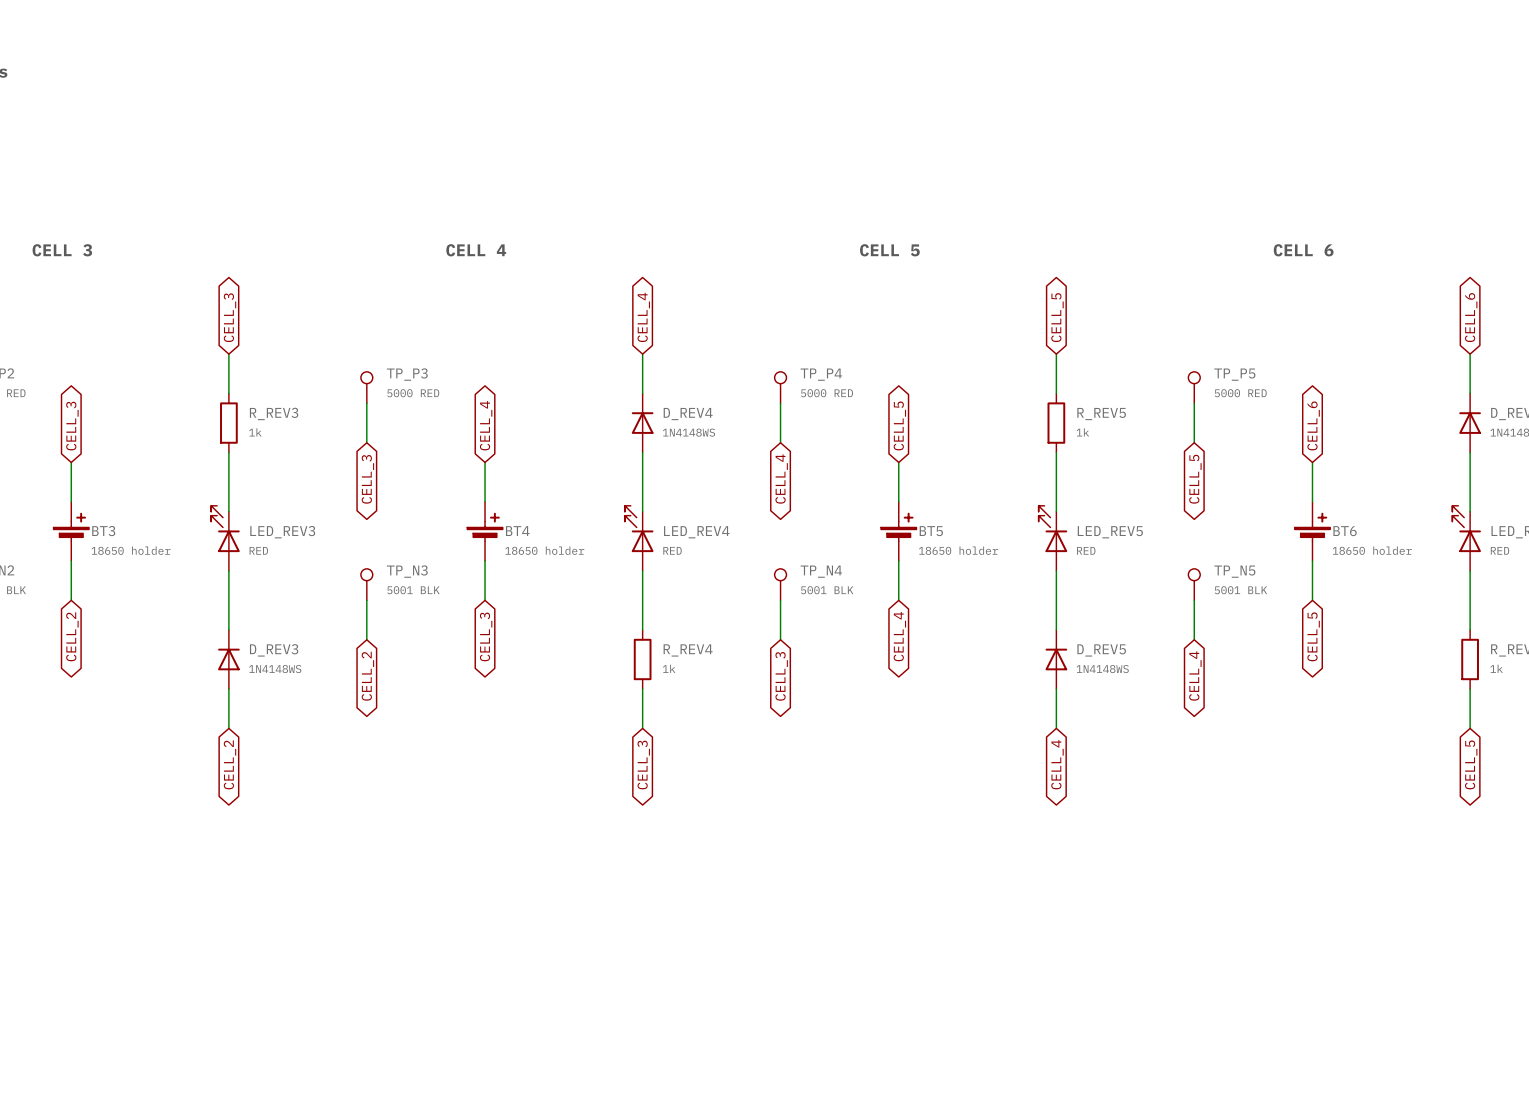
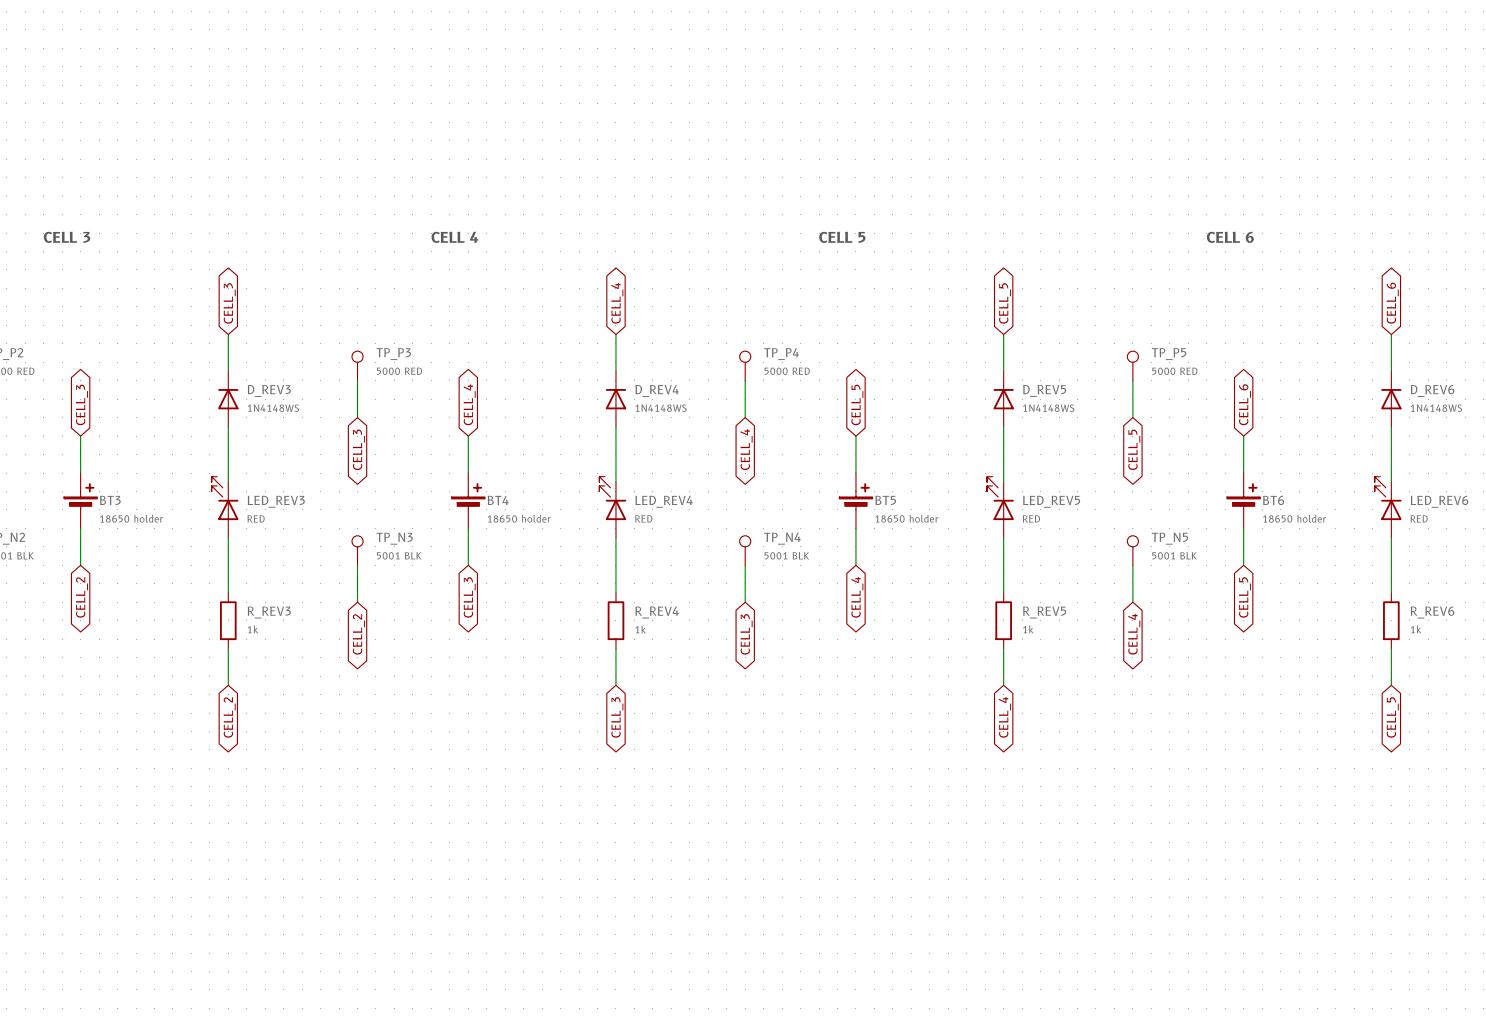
R_REV3 position: (228, 423) -> (228, 620)
R_REV5 position: (1056, 423) -> (1003, 620)
D_REV3 position: (228, 659) -> (228, 399)
D_REV5 position: (1056, 659) -> (1003, 399)

